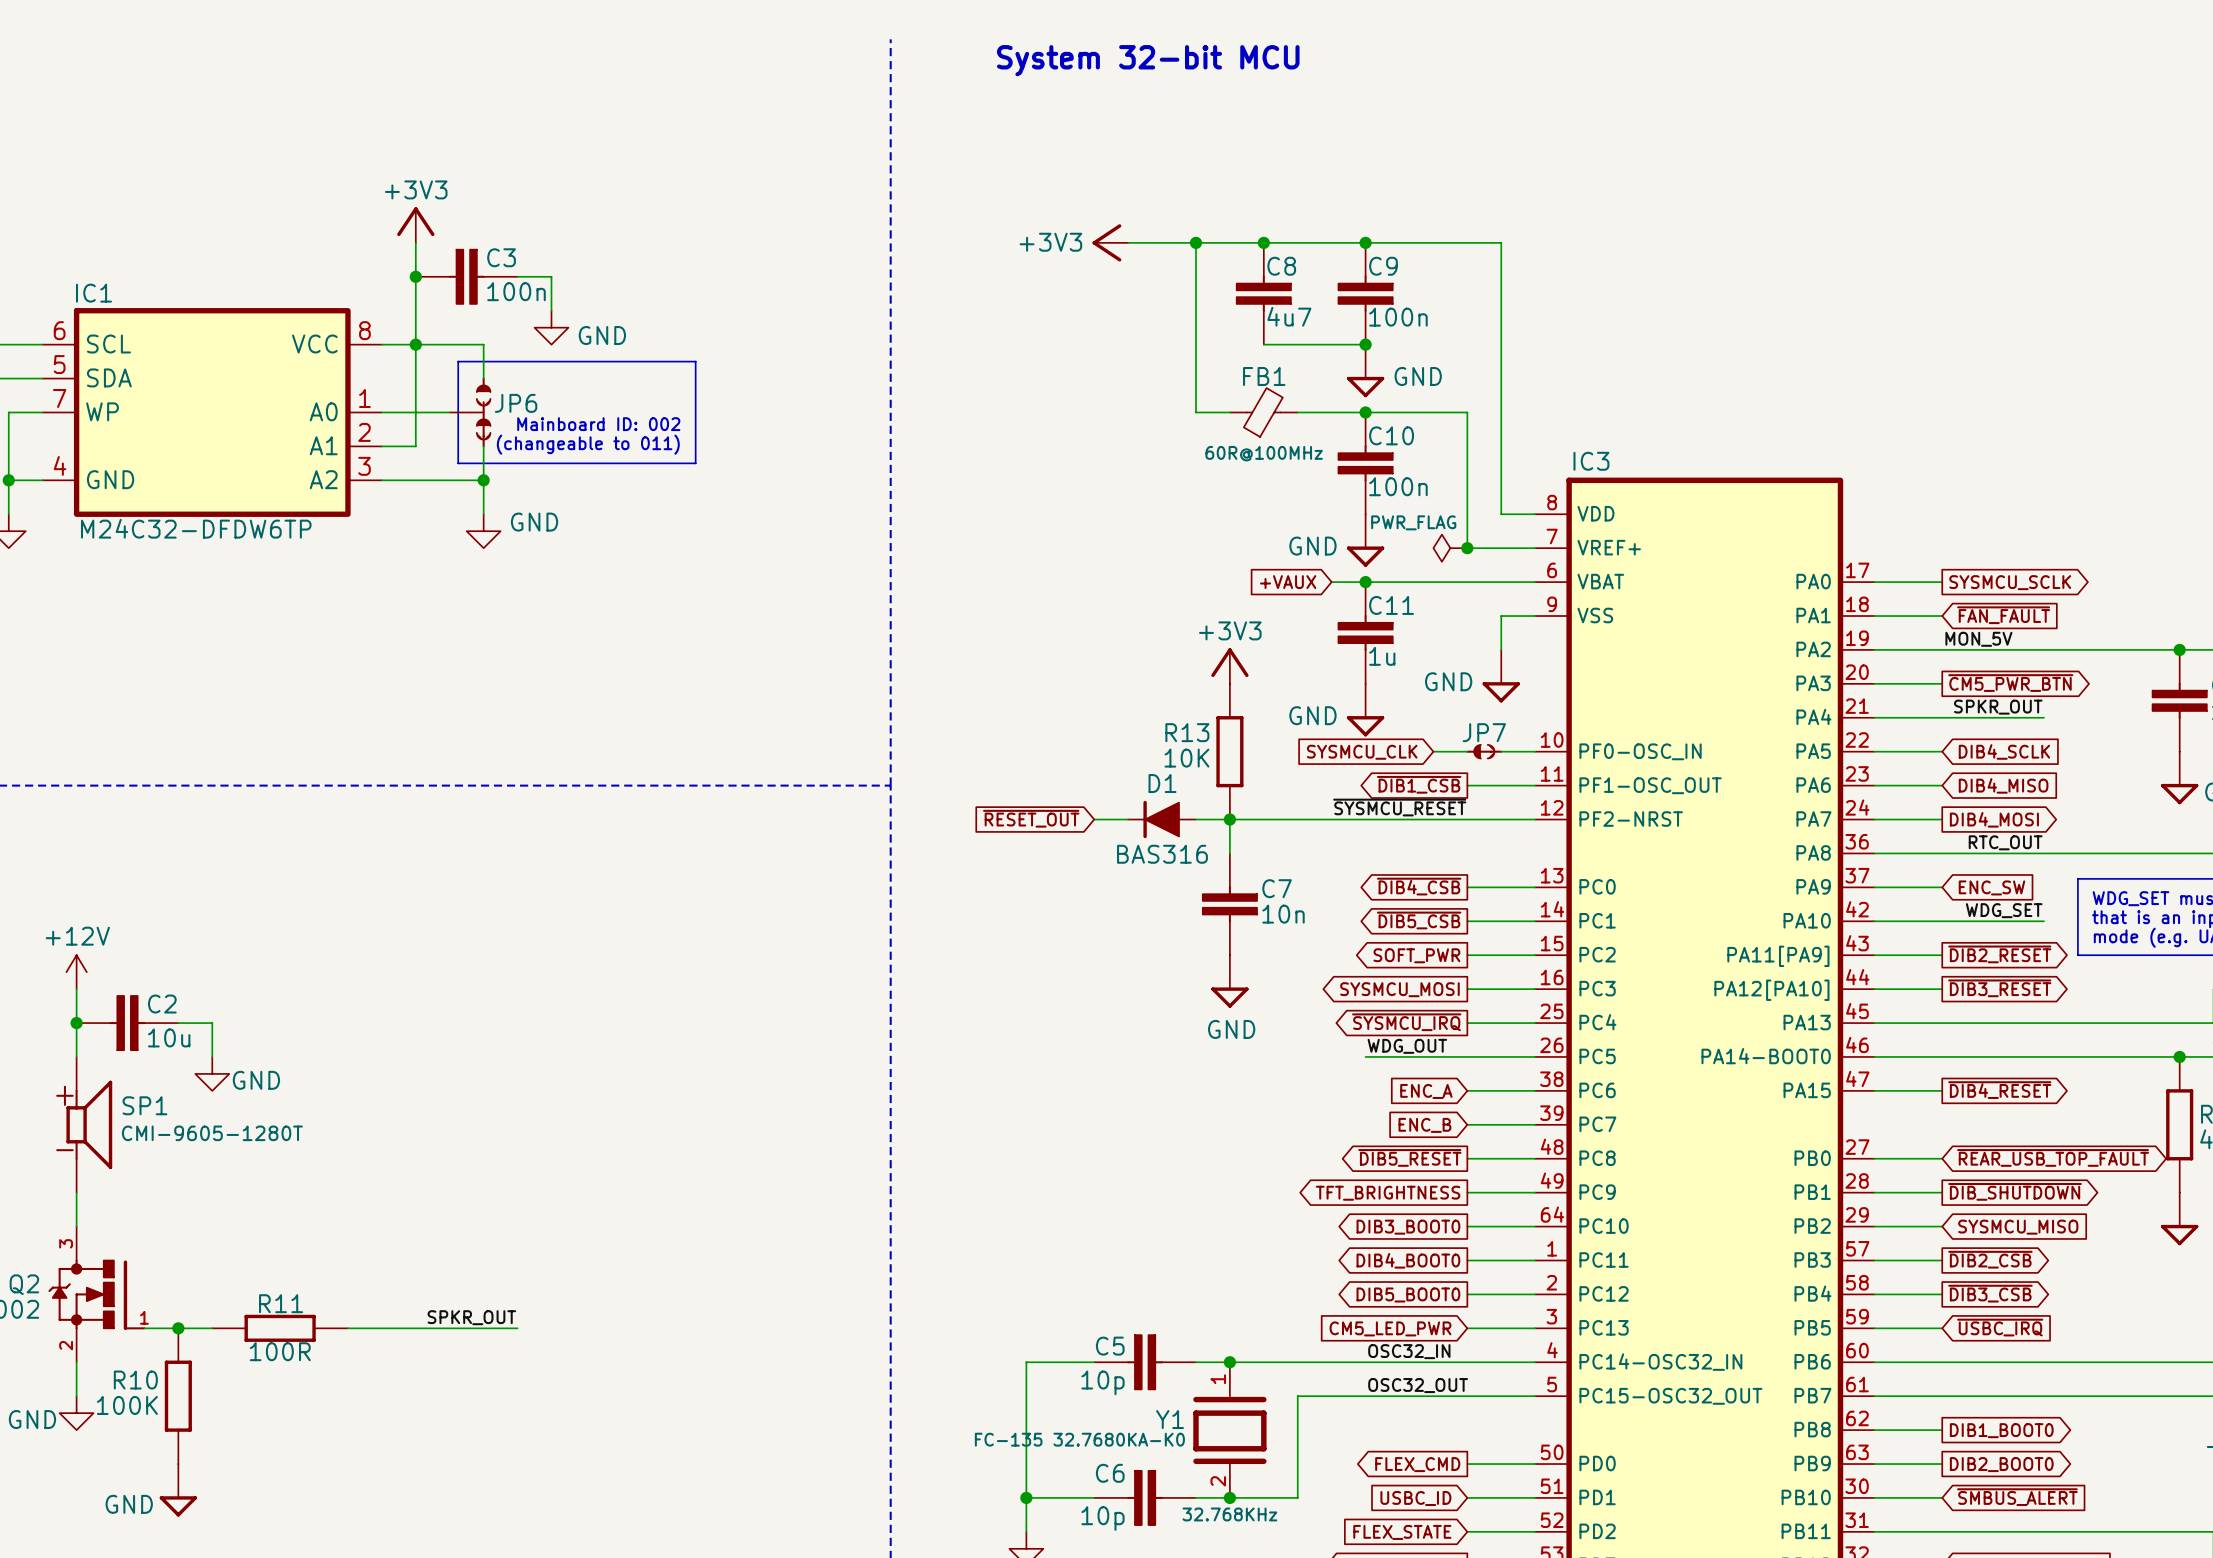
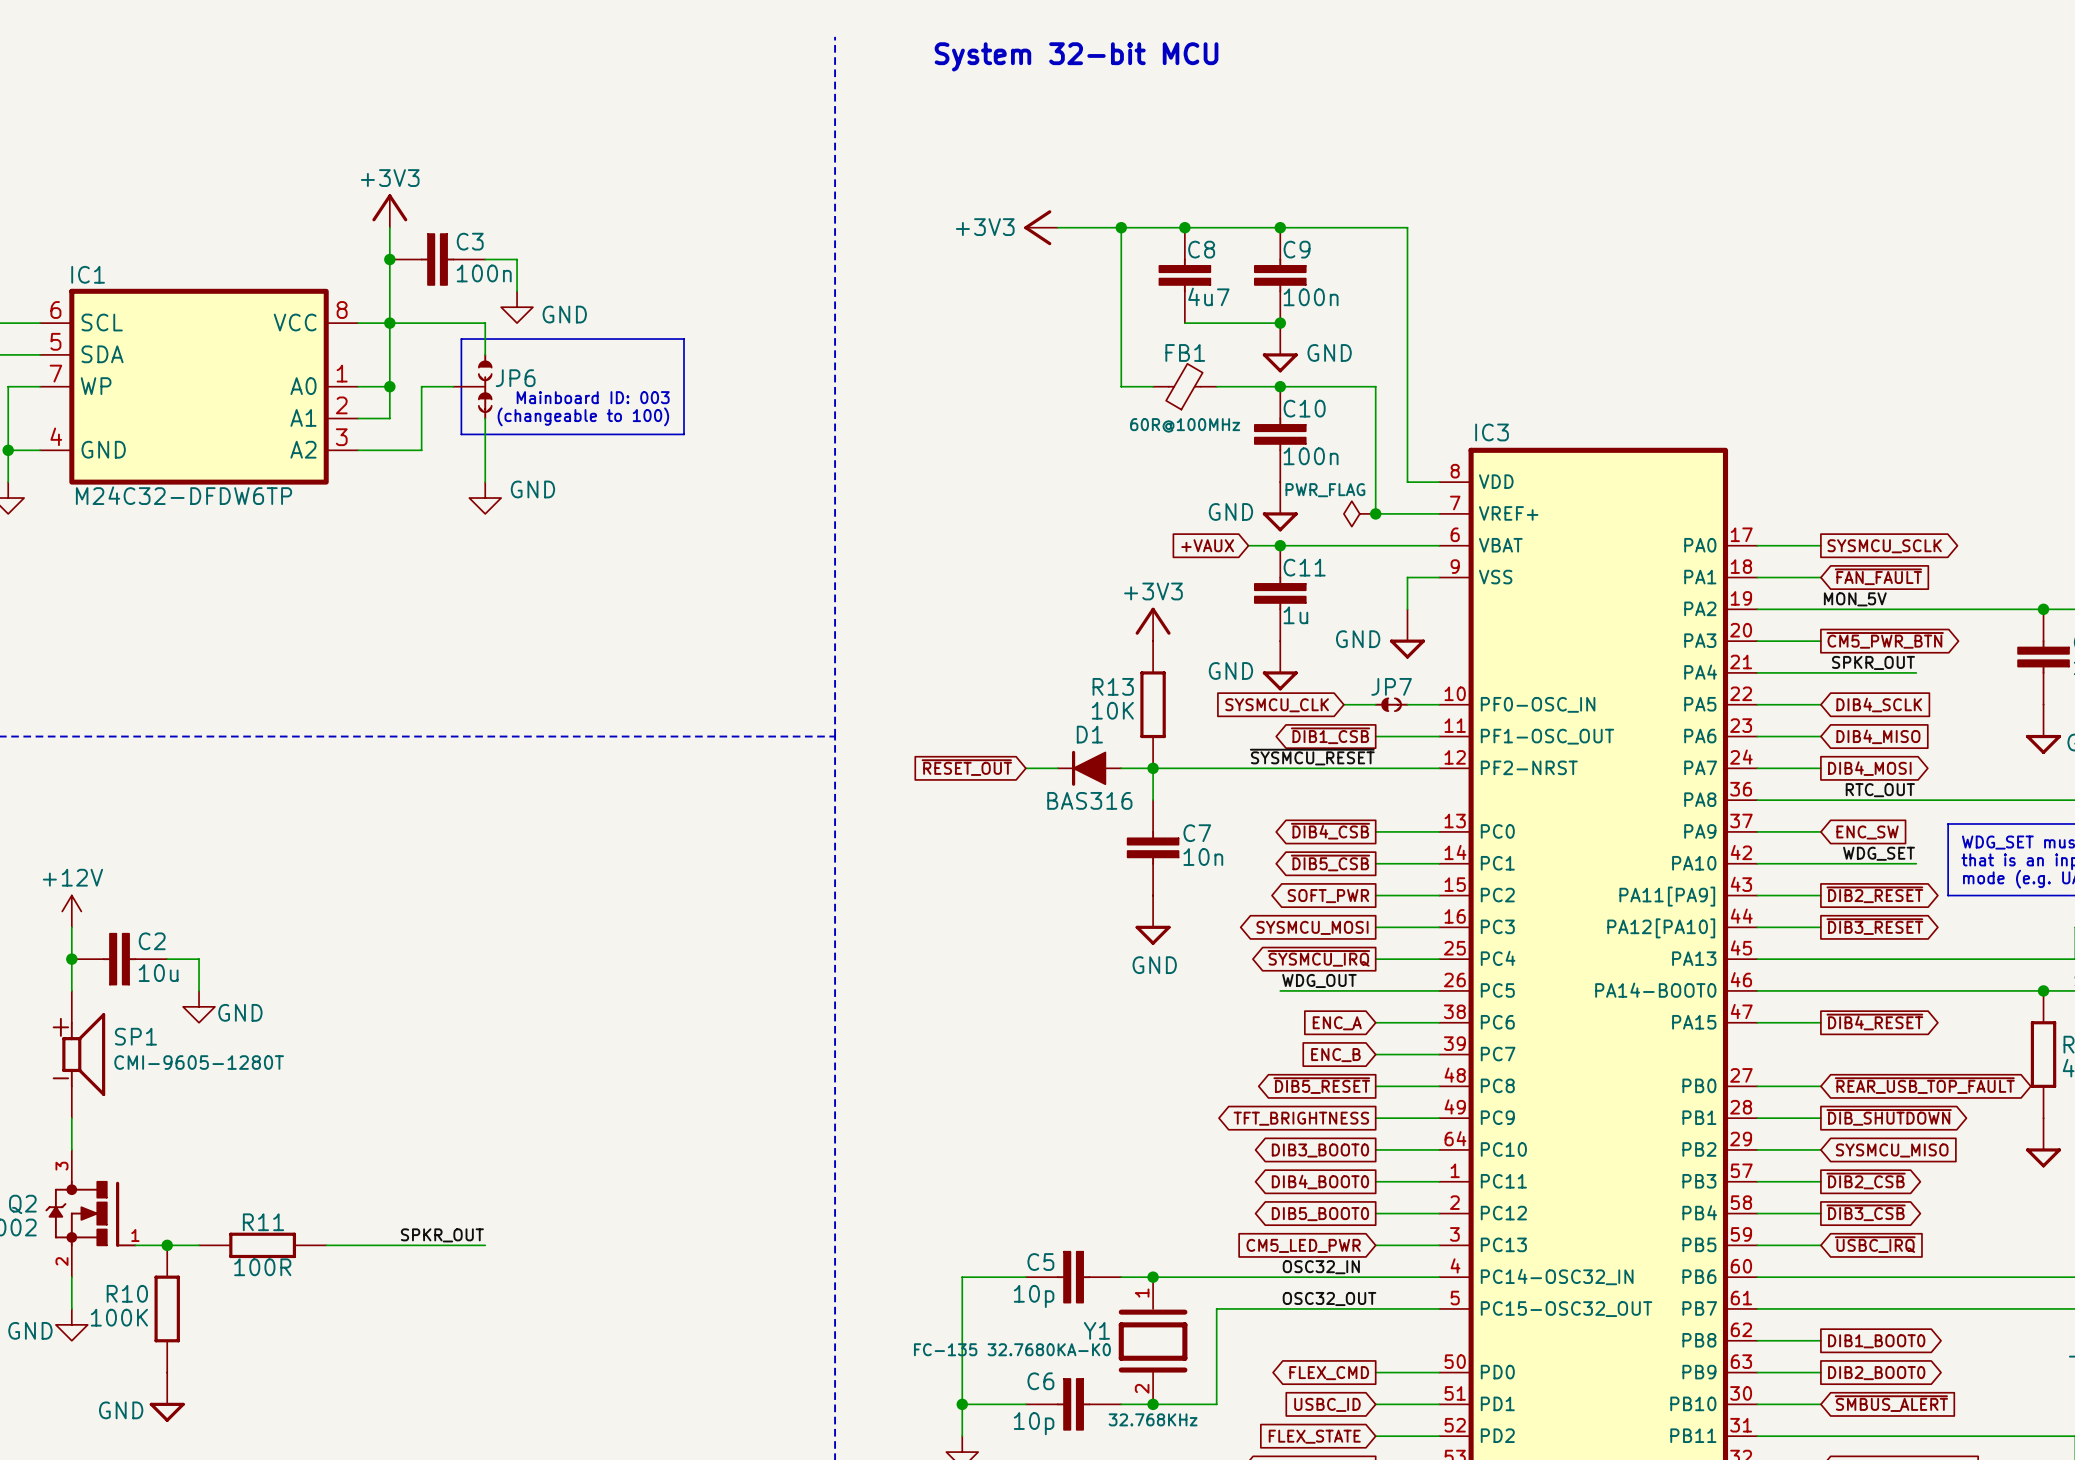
wire: (483, 344) (483, 378) -> (453, 323) (485, 323) (485, 354)
line: (492, 361) (458, 361) (458, 463) (492, 463) -> (461, 339) (461, 434)
line: (695, 361) (695, 463) -> (652, 339) (684, 339) (684, 434) (652, 434)
wire: (415, 412) (449, 412) -> none
junction: none -> (389, 386)
JP6 position: (470, 412) -> (472, 386)
text: Mainboard ID: 002 (598, 424) -> Mainboard ID: 003 (593, 397)
text: (changeable to 011) (588, 444) -> (changeable to 100) (583, 416)
wire: (483, 446) (483, 514) -> (485, 418) (485, 482)
wire: (449, 480) (483, 480) -> (421, 450) (421, 386) (453, 386)
junction: (483, 480) -> none
power symbol position: GND (483, 531) -> GND (485, 498)

